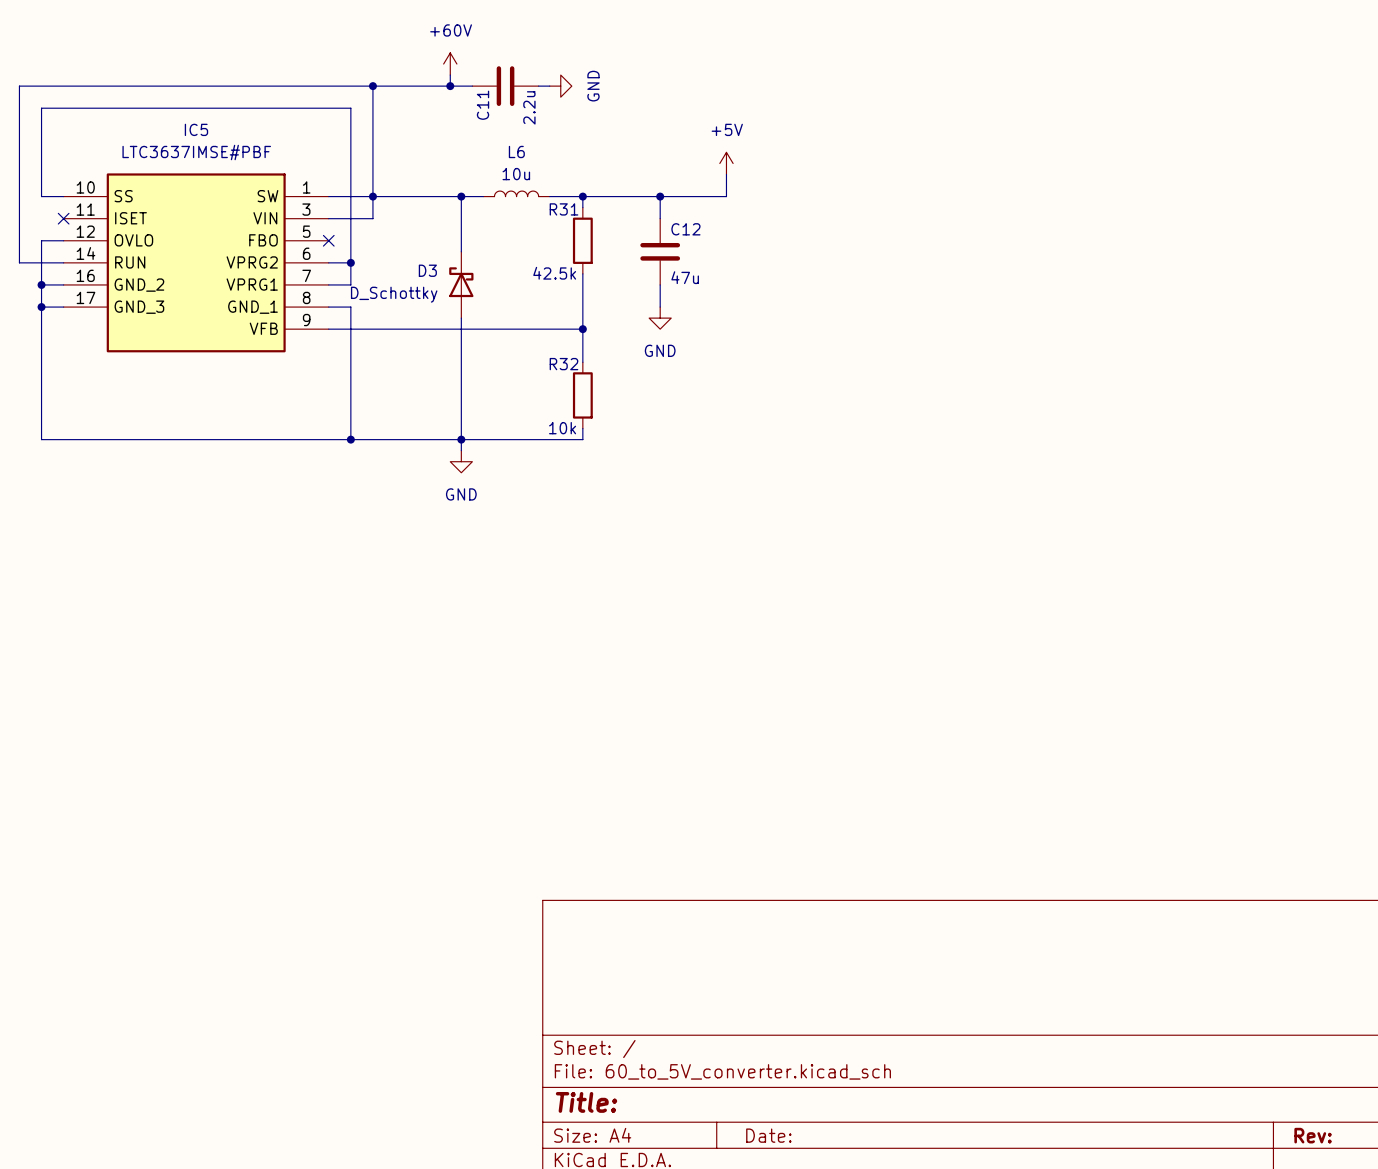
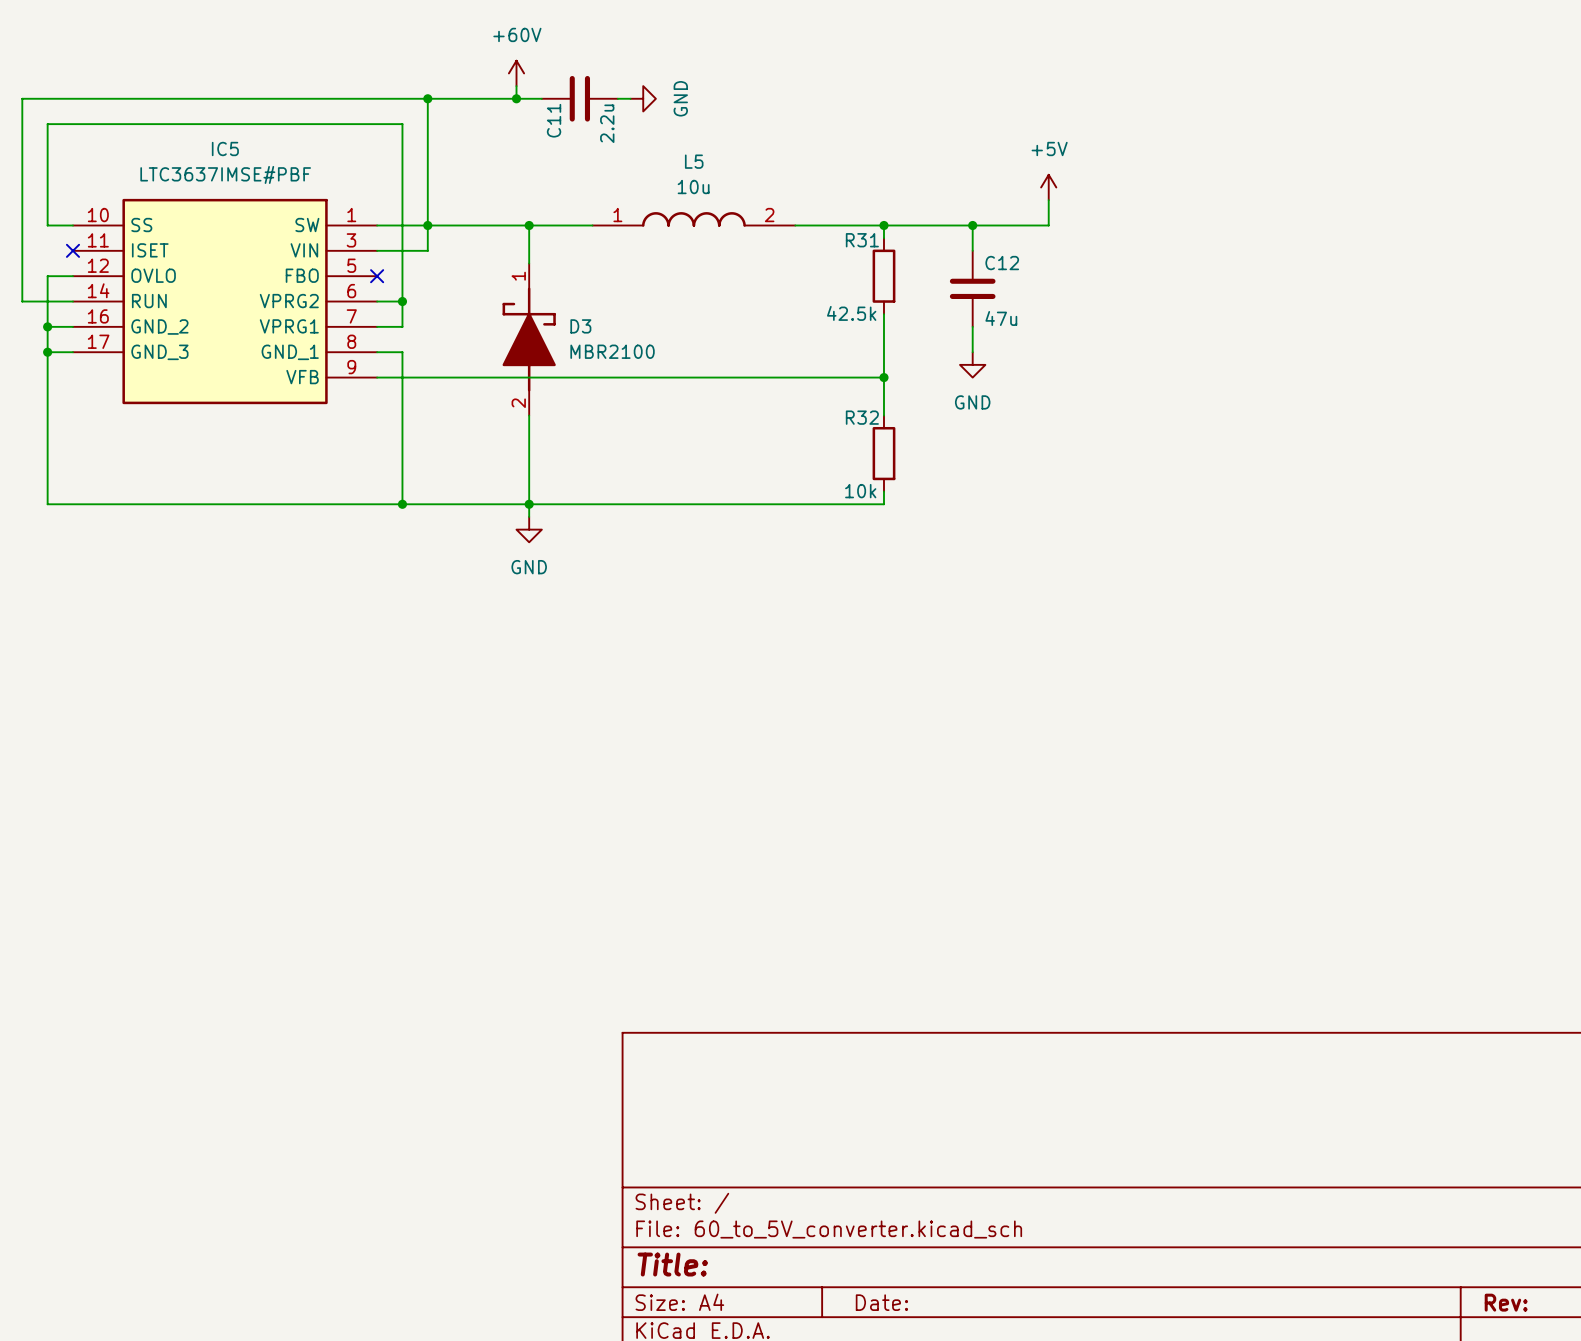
power symbol position: +5V (726, 163) -> +5V (1048, 187)
wire: (726, 174) (726, 196) -> (1048, 200) (1048, 225) (833, 225)
L5: none -> 10u (693, 219)
L6: 10u (516, 193) -> none
wire: none -> (554, 225) (592, 225)
wire: (549, 196) (693, 196) -> none
wire: (582, 196) (582, 207) -> (883, 225) (883, 238)
junction: (582, 196) -> none
wire: (660, 196) (660, 218) -> (972, 225) (972, 250)
junction: (660, 196) -> none
junction: none -> (883, 225)
junction: none -> (972, 225)
R31 position: (582, 240) -> (883, 276)
D3 symbol: [449, 251, 474, 319] -> [502, 263, 556, 416]
C12 position: (660, 251) -> (972, 288)
D3 name position: D3 (427, 270) -> D3 (580, 326)
wire: (582, 273) (582, 362) -> (883, 314) (883, 415)
wire: (660, 284) (660, 307) -> (972, 326) (972, 352)
D3 value: D_Schottky (394, 294) -> MBR2100 (612, 351)
power symbol position: GND (660, 318) -> GND (972, 364)
wire: none -> (668, 377) (883, 377)
junction: (582, 329) -> none
junction: none -> (883, 377)
R32 position: (582, 395) -> (883, 453)
wire: (582, 428) (582, 439) -> (883, 491) (883, 504) (668, 504)

